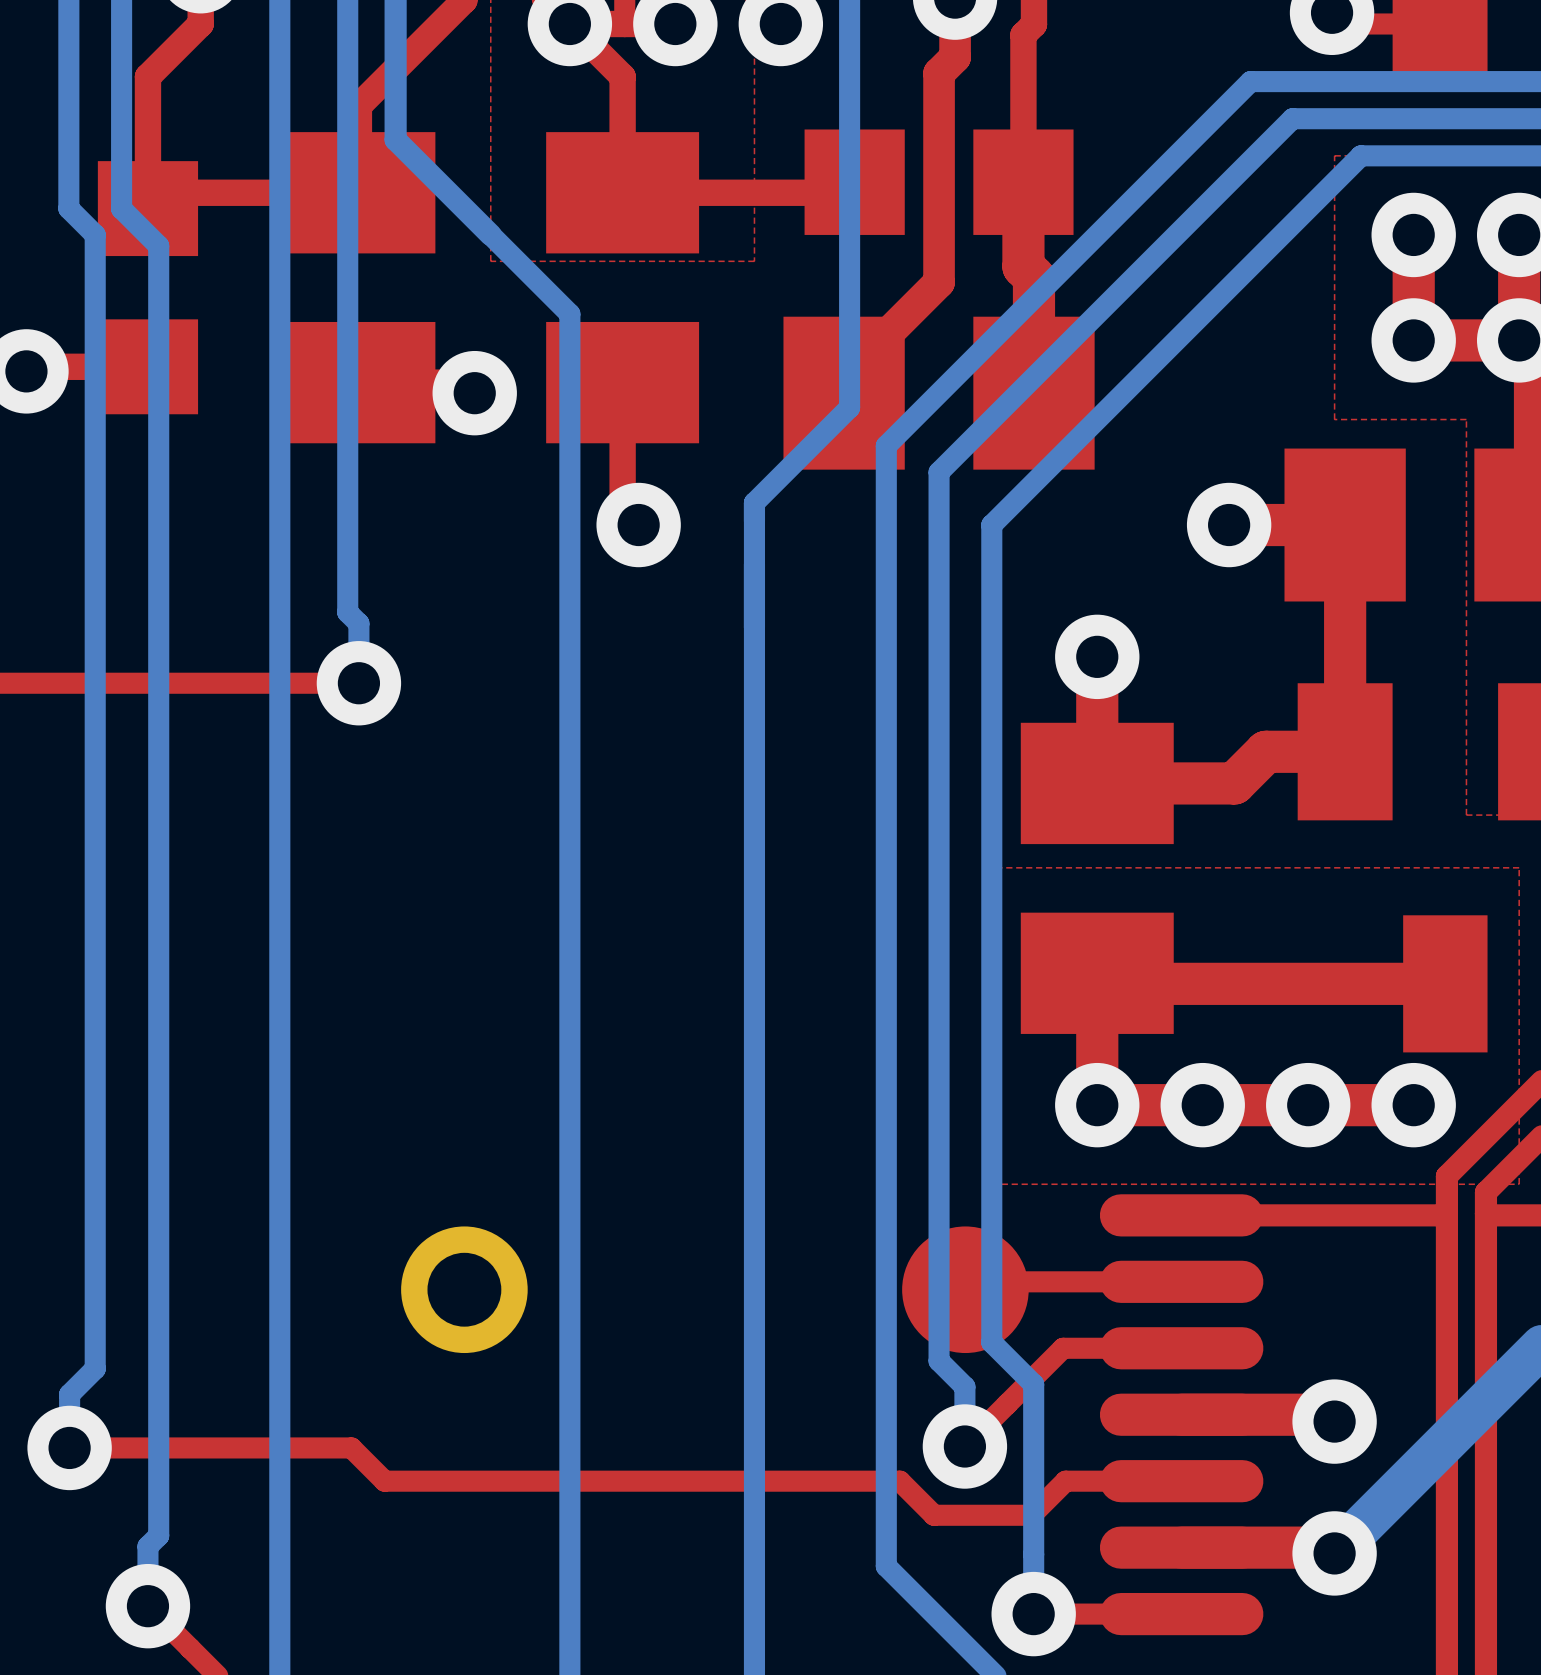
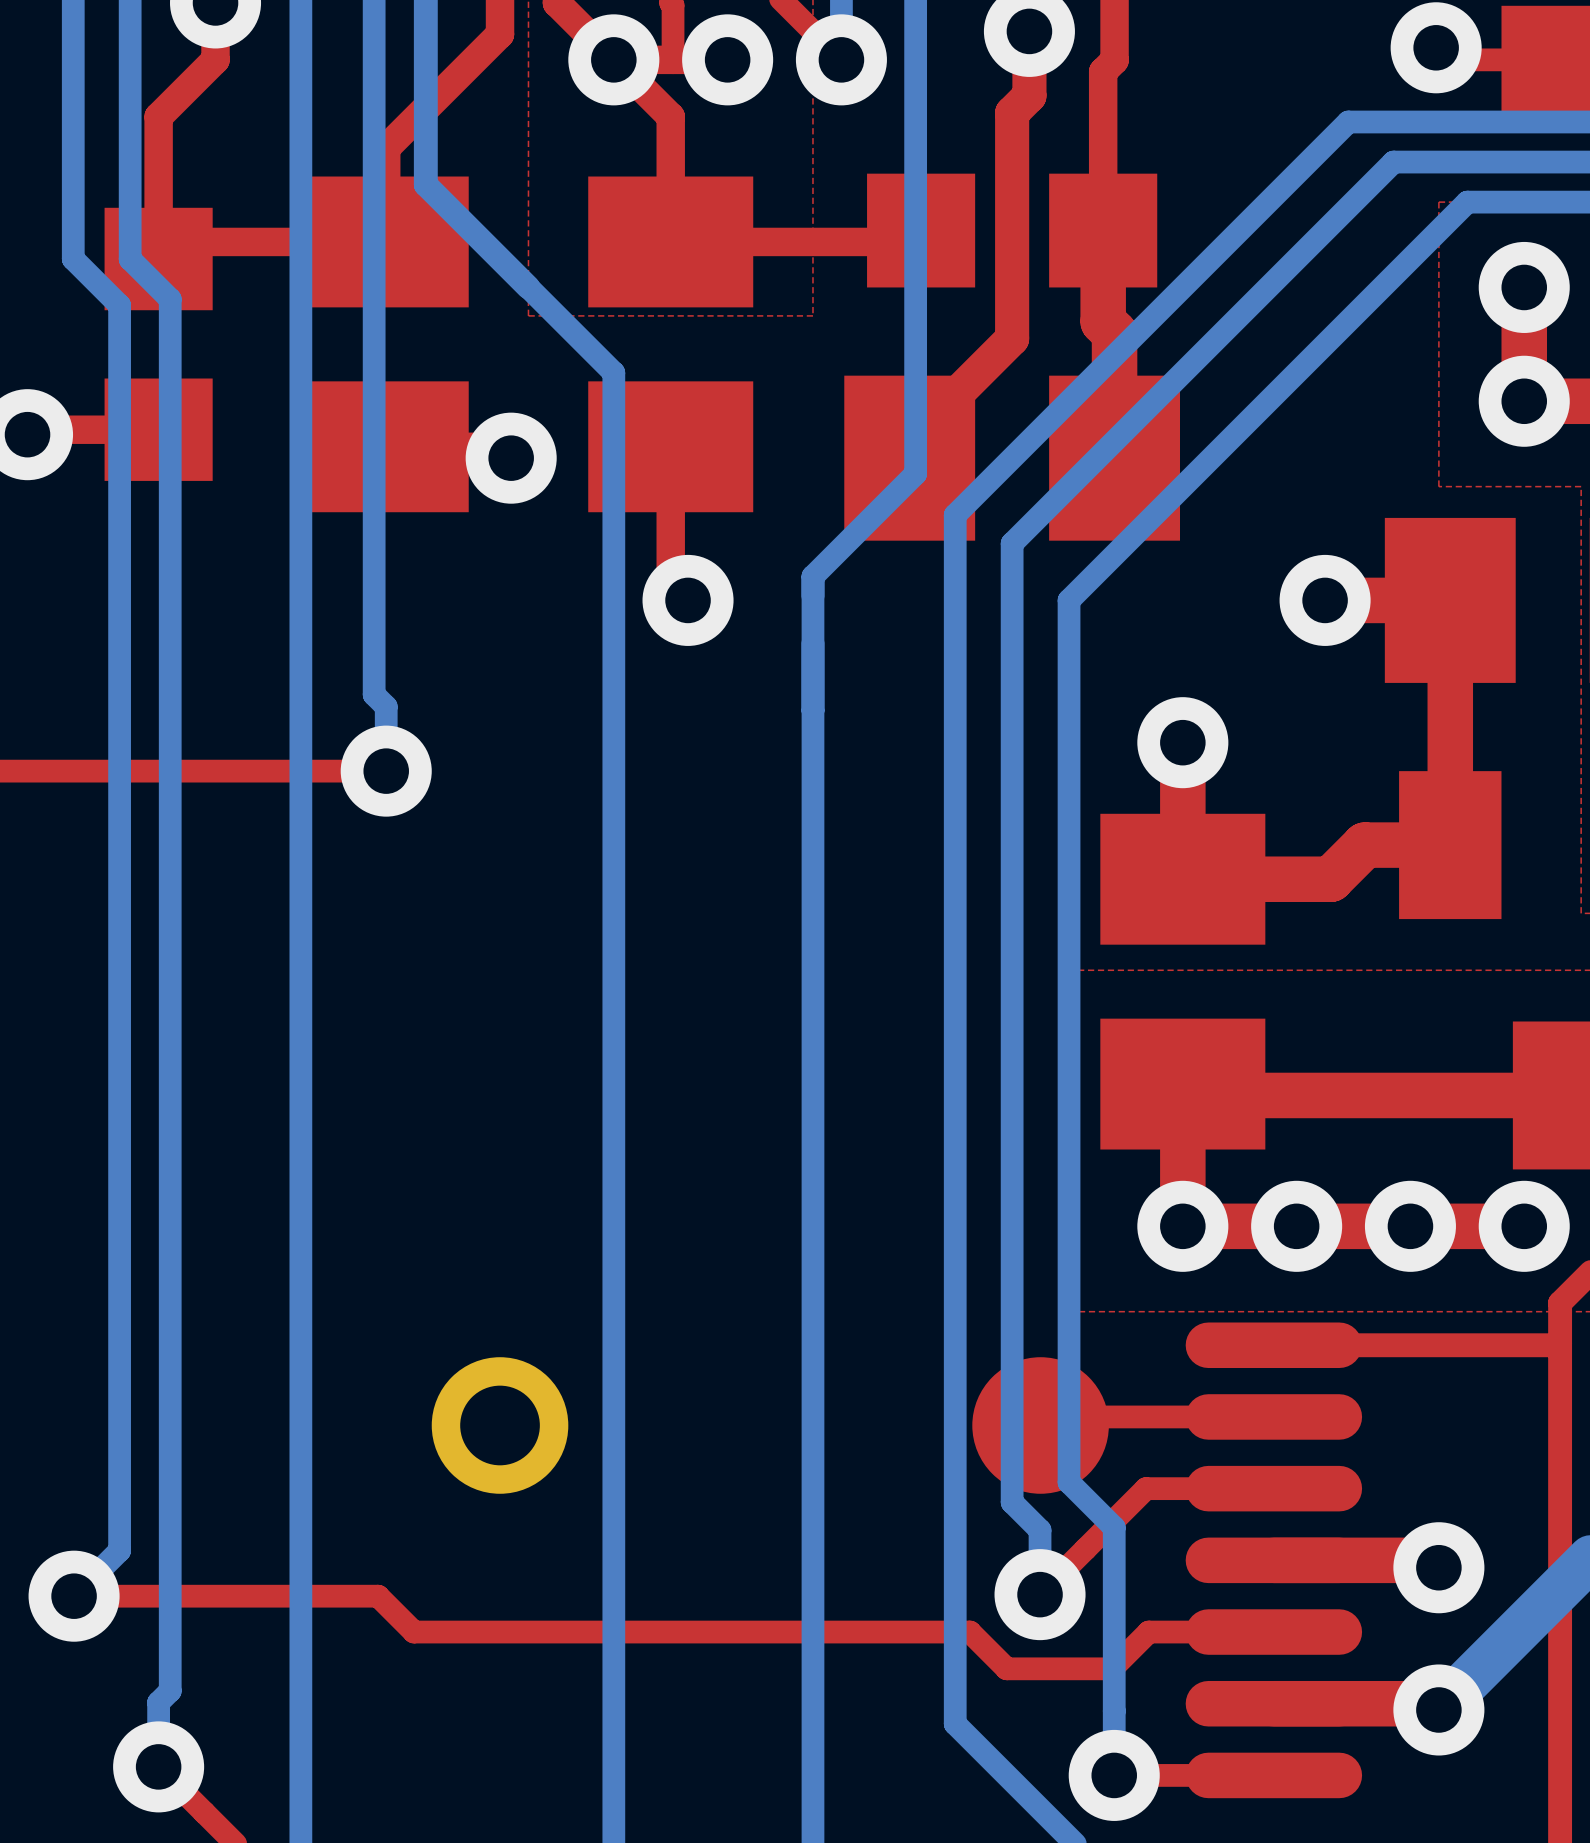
bottom track: (95, 234) (95, 1368) (69, 1394) (69, 1447) -> (101, 287) (119, 305) (119, 1550) (74, 1596)

